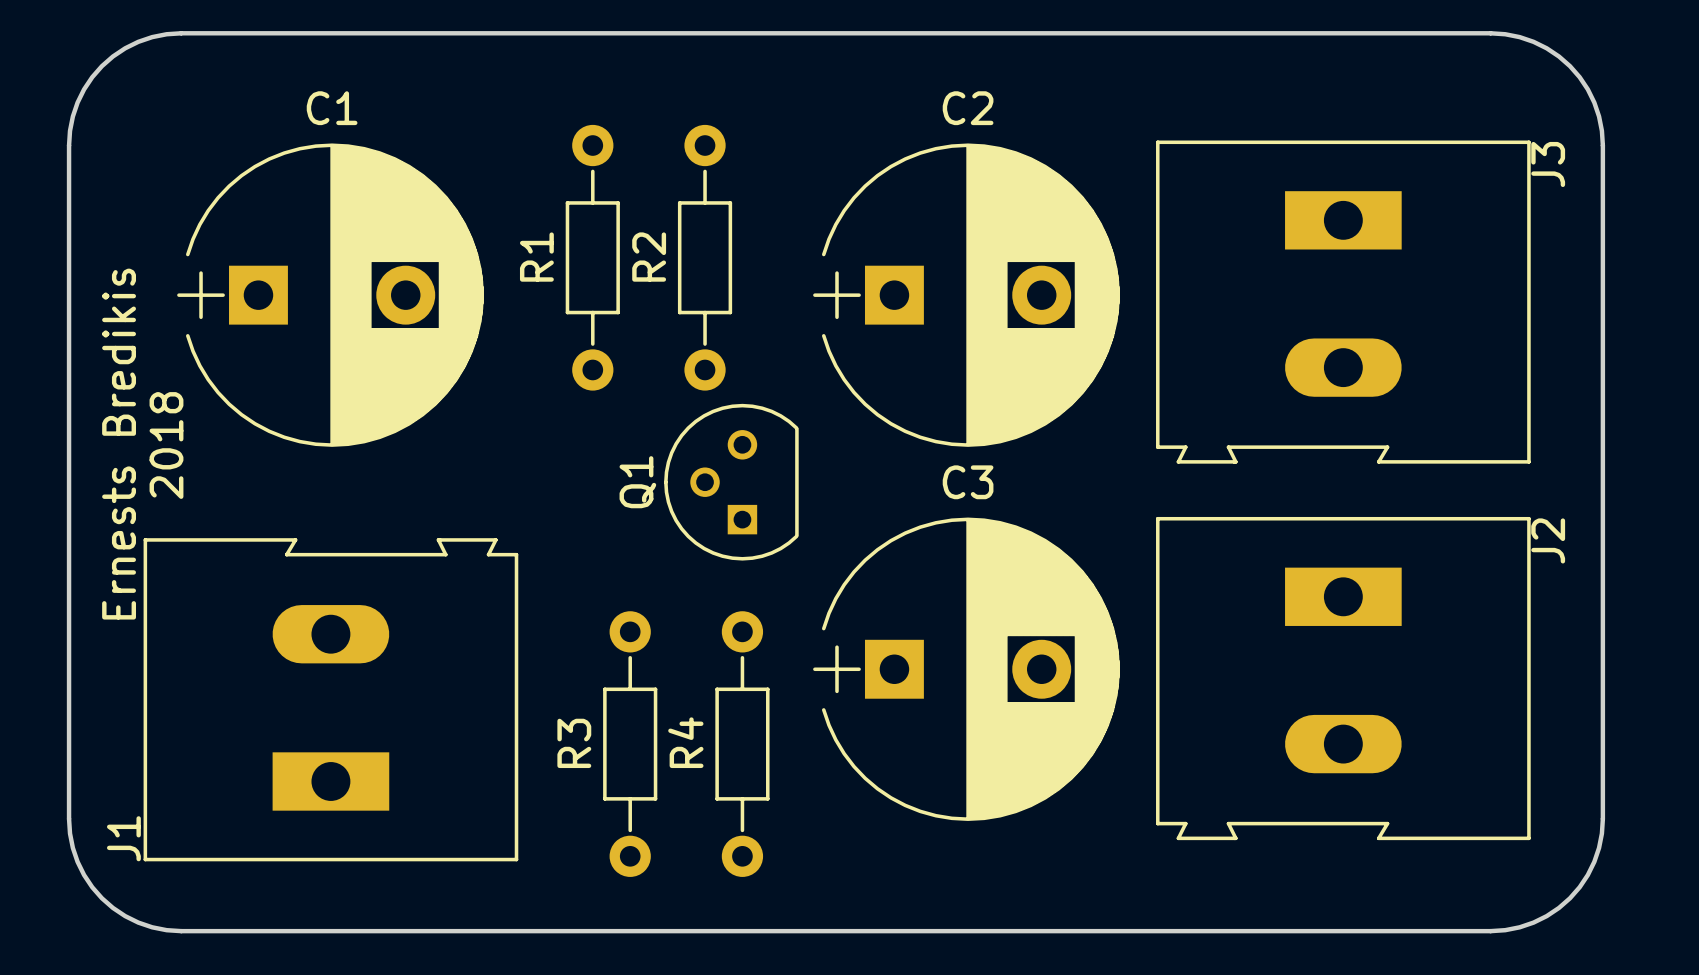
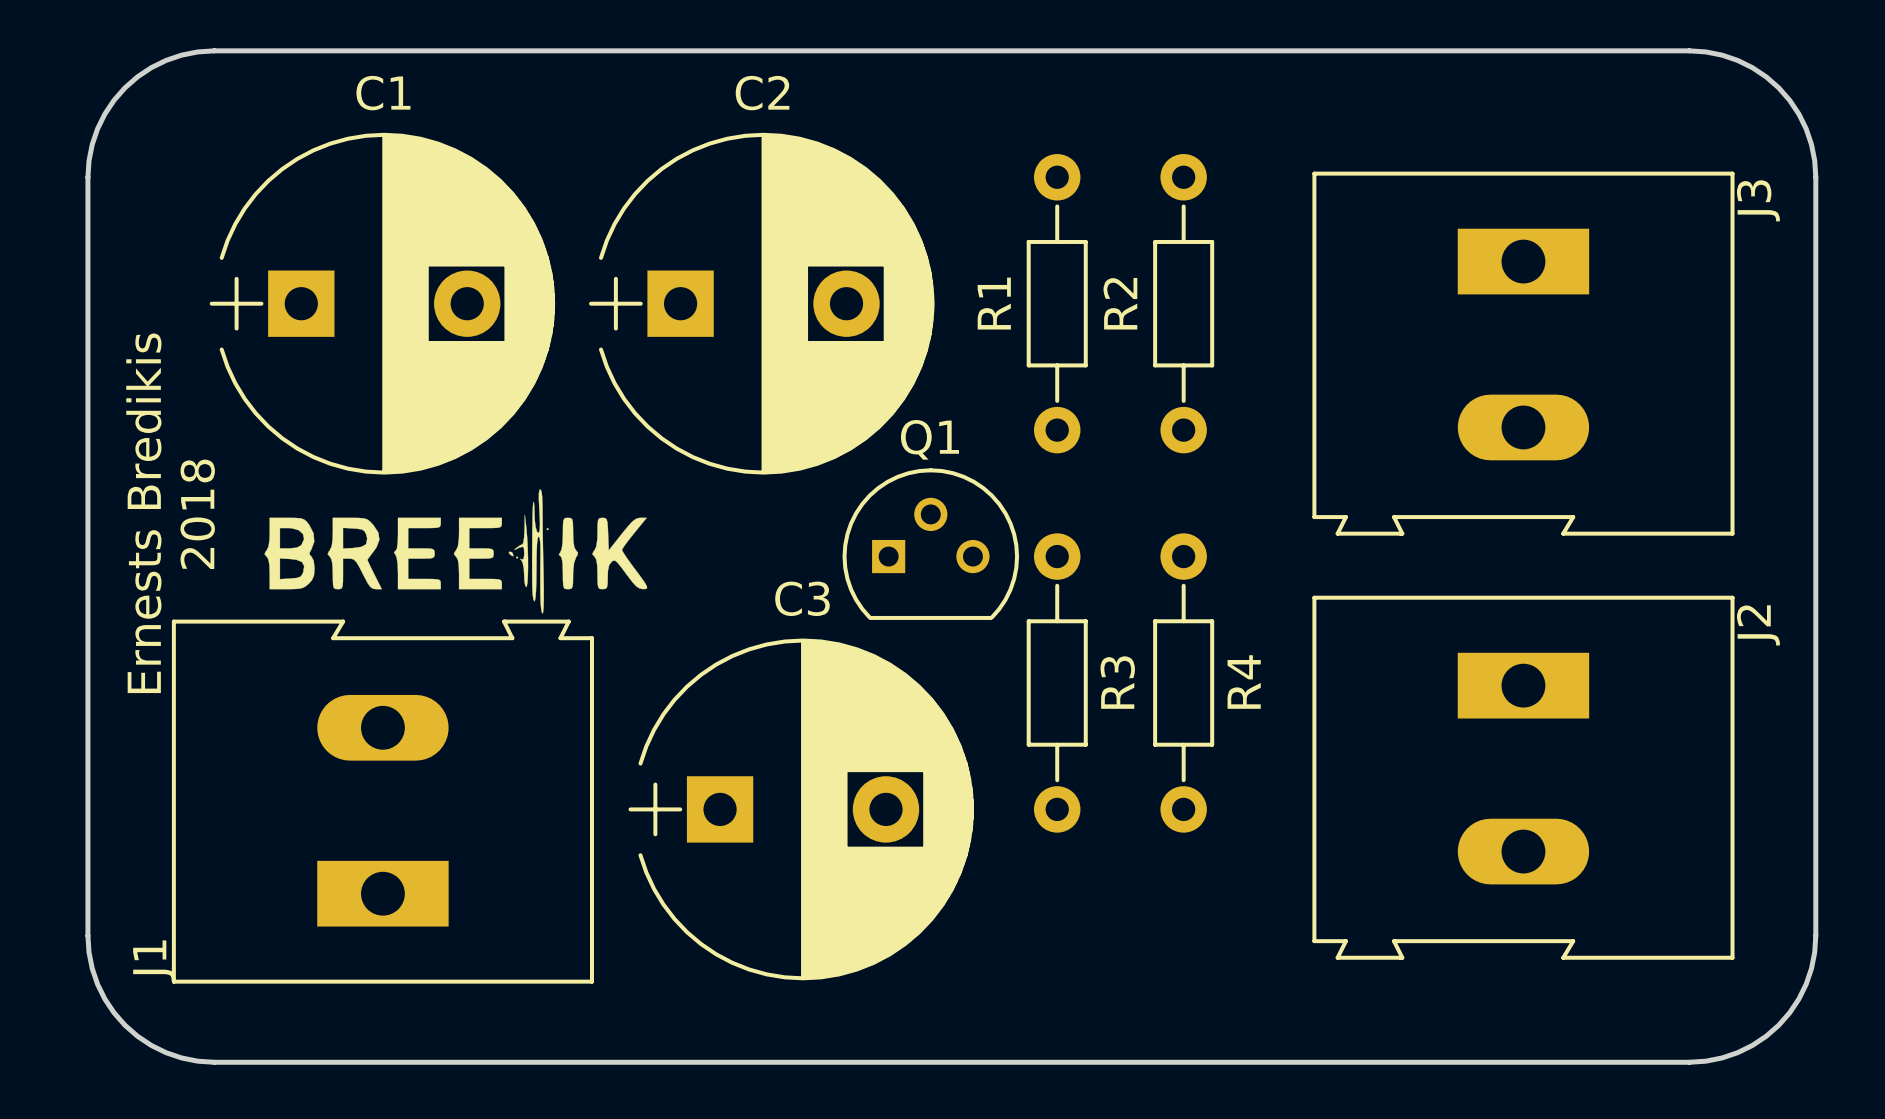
R1 position: (592, 257) -> (1057, 303)
R2 position: (705, 257) -> (1183, 303)
C1 position: (330, 295) -> (382, 303)
C2 position: (966, 295) -> (761, 303)
drawing: none -> [264, 489, 648, 614]
Q1 rotation: 0° (731, 482) -> 90° clockwise (930, 544)
C3 position: (966, 669) -> (801, 809)
R4 name position: R4 (685, 742) -> R4 (1244, 682)
R3 name position: R3 (574, 743) -> R3 (1117, 682)
R3 position: (630, 744) -> (1057, 682)
R4 position: (742, 744) -> (1183, 682)

